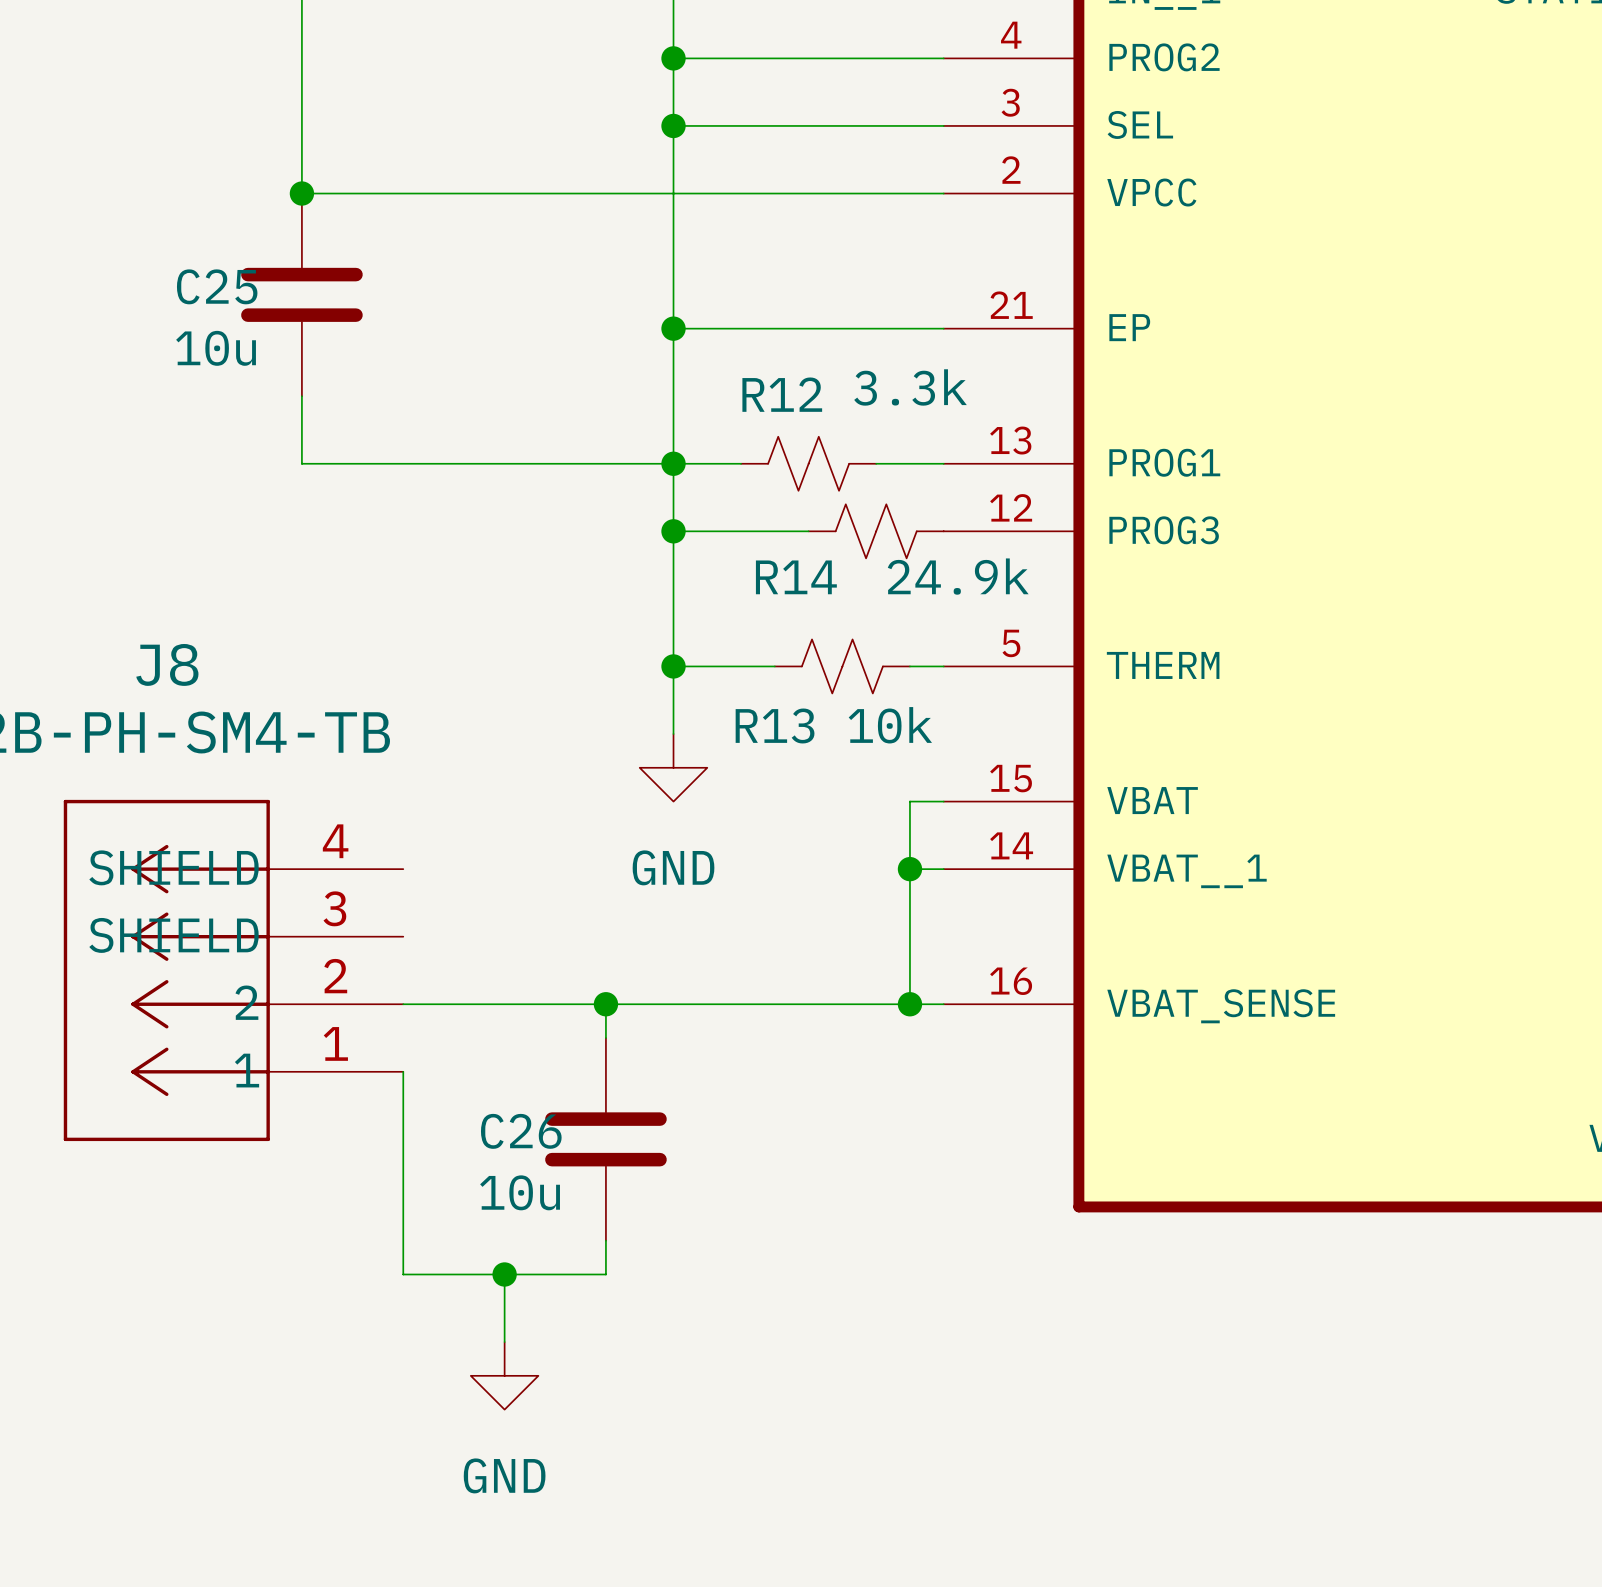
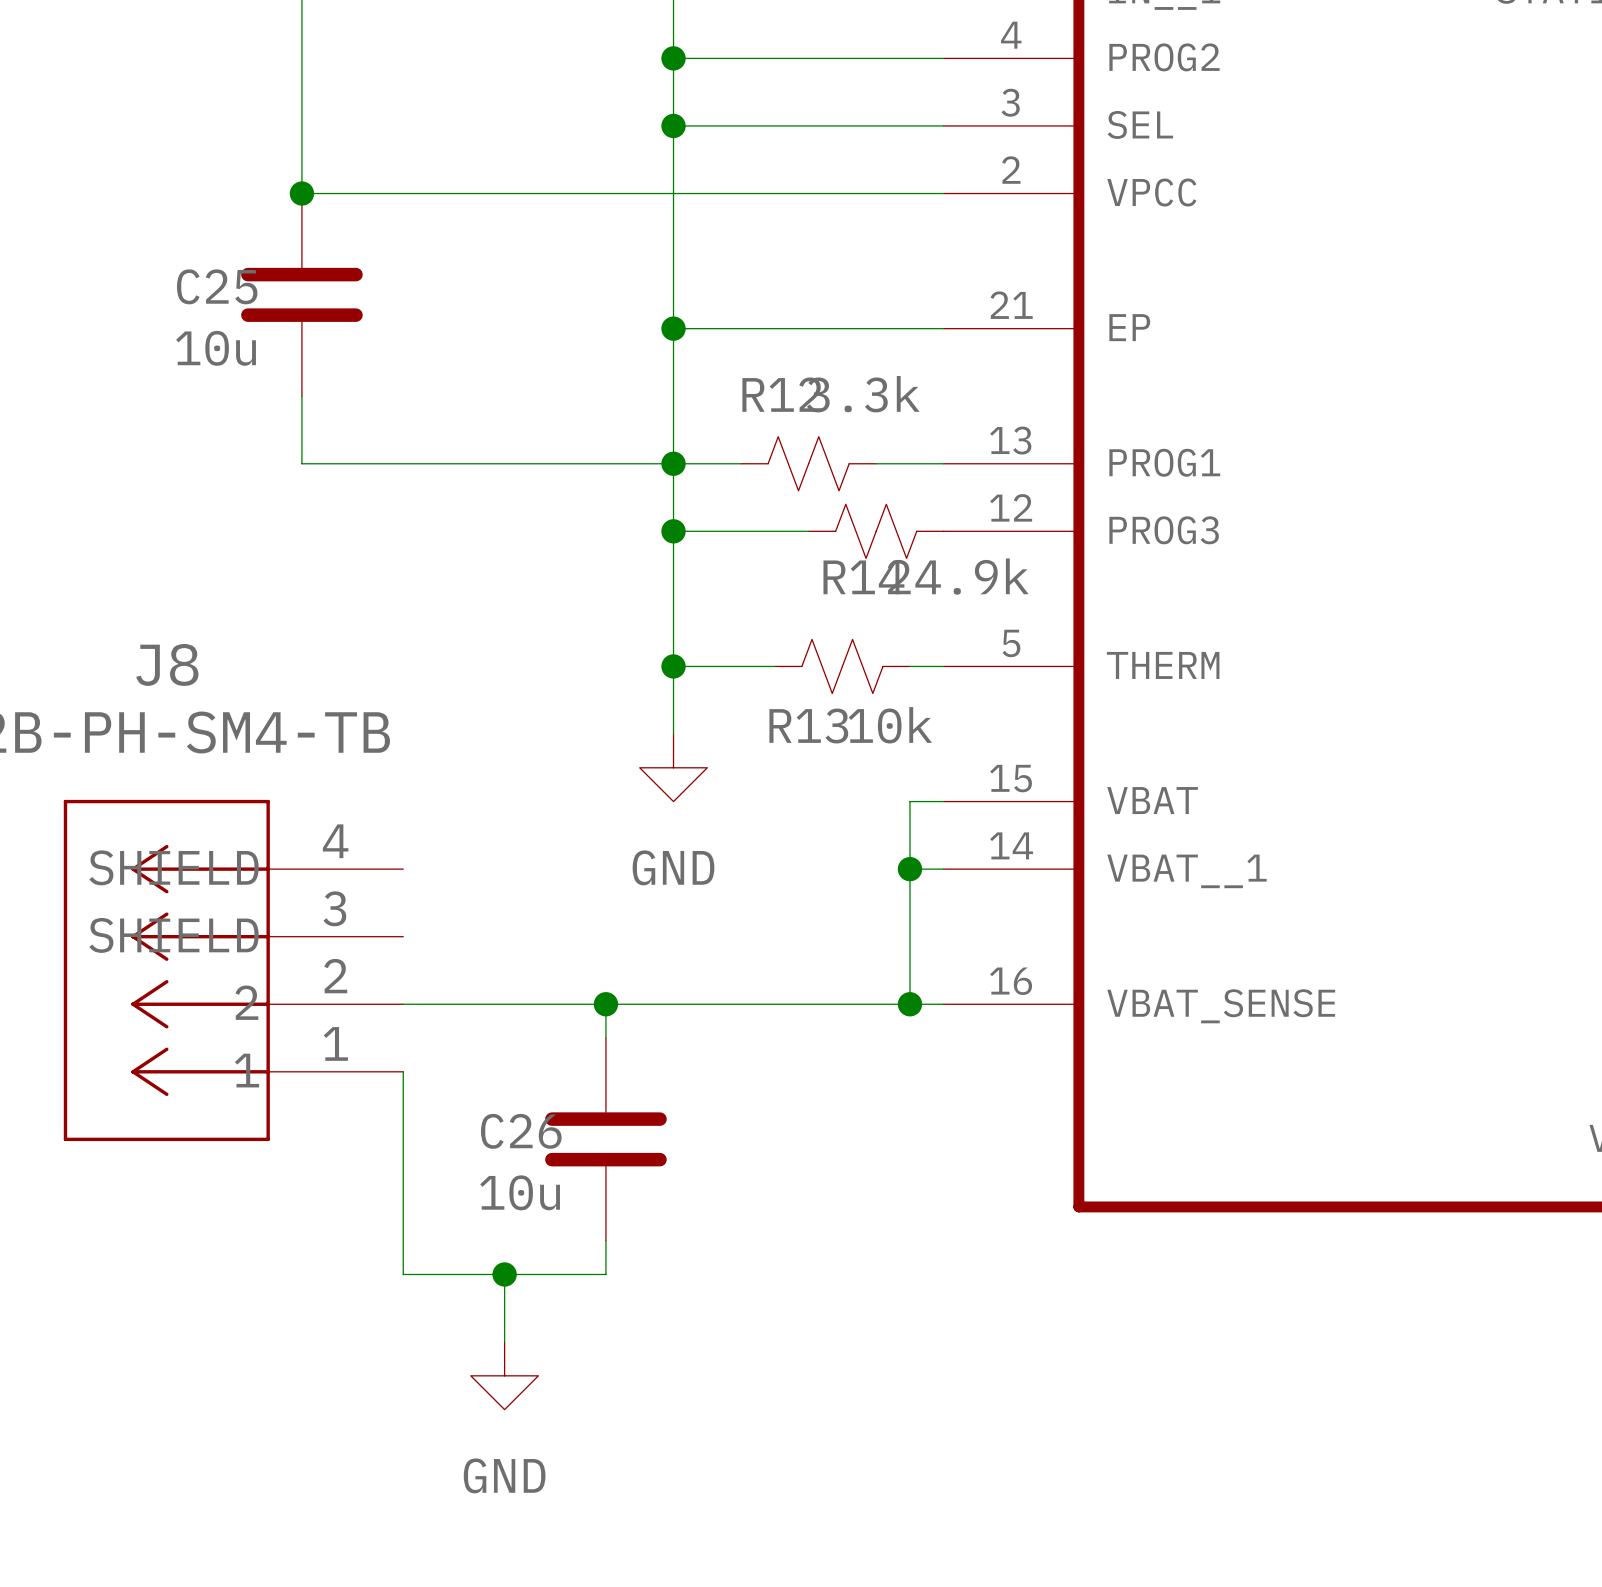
R12 value position: 3.3k (910, 387) -> 3.3k (863, 394)
R14 name position: R14 (796, 577) -> R14 (863, 577)
R13 name position: R13 (775, 725) -> R13 (808, 725)

